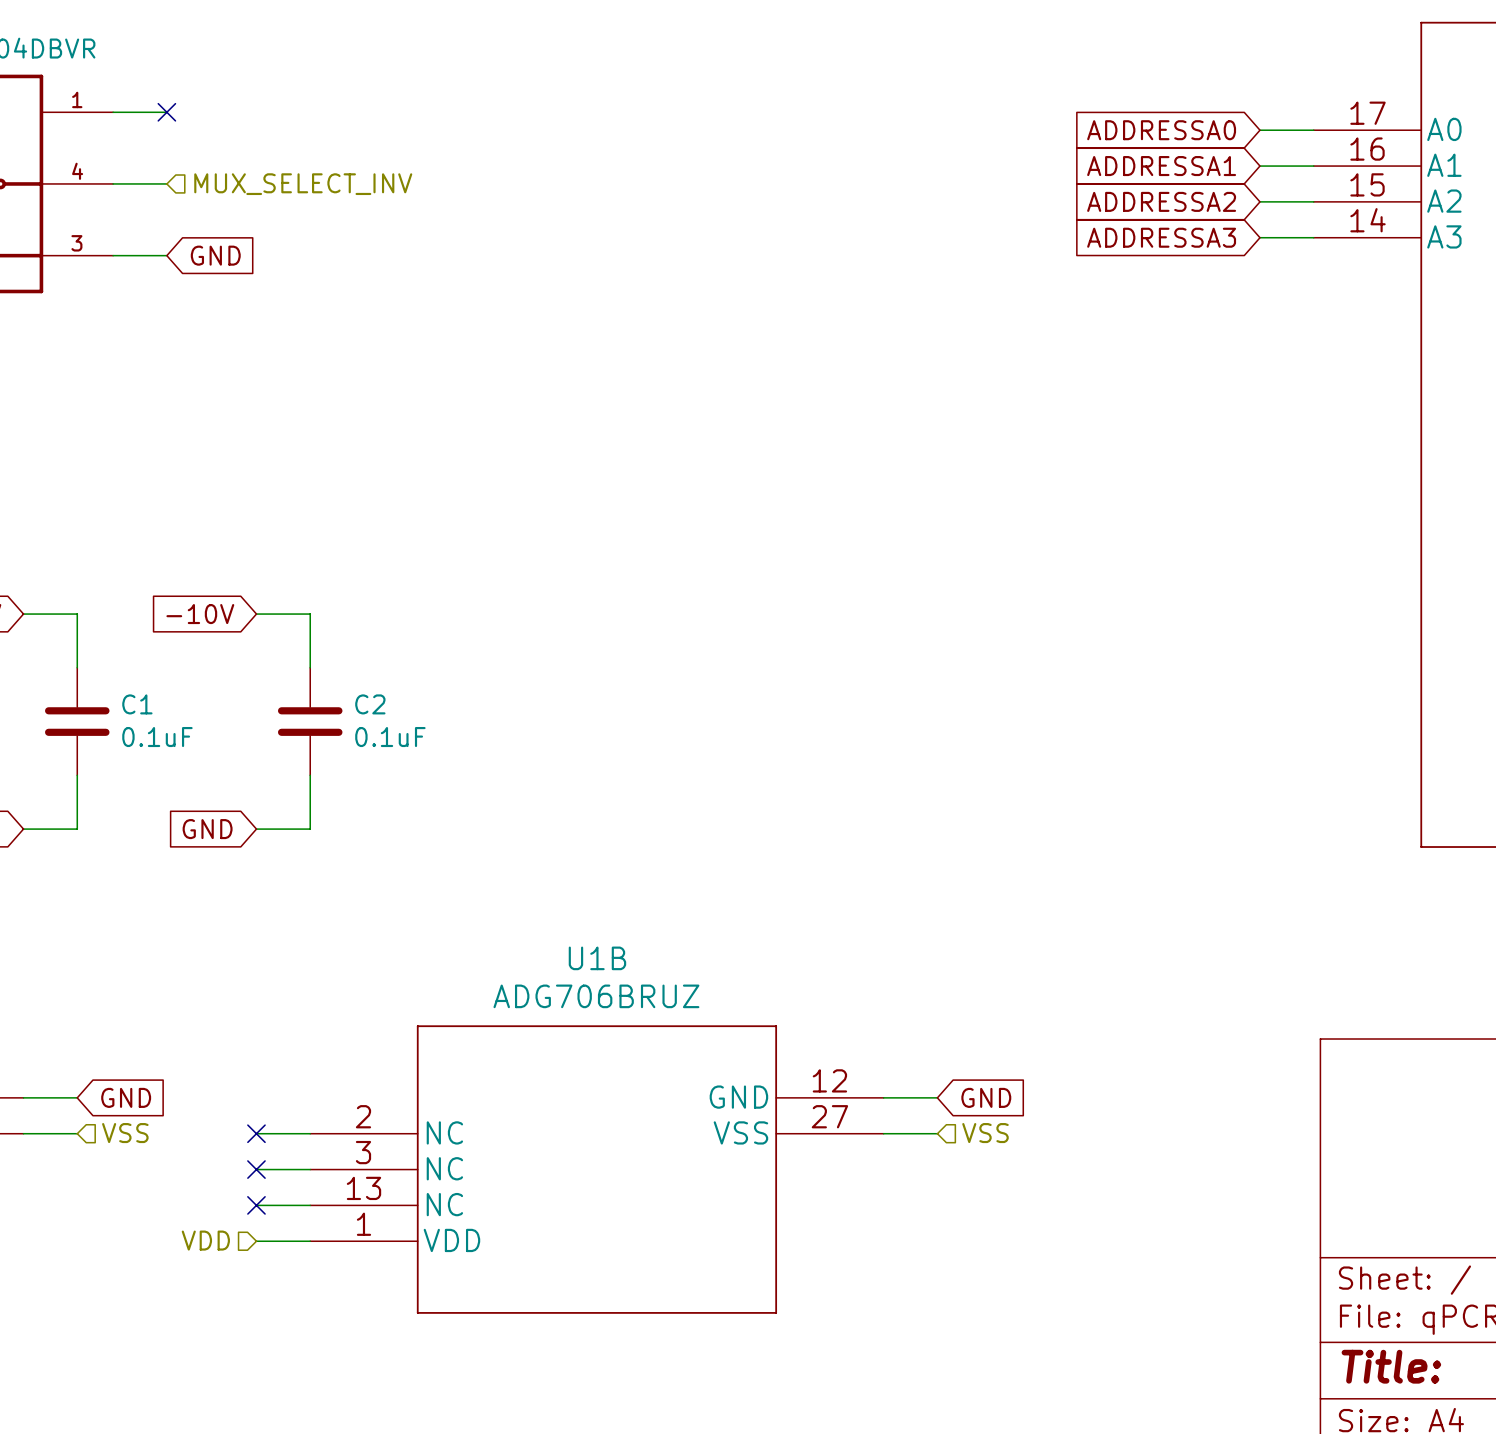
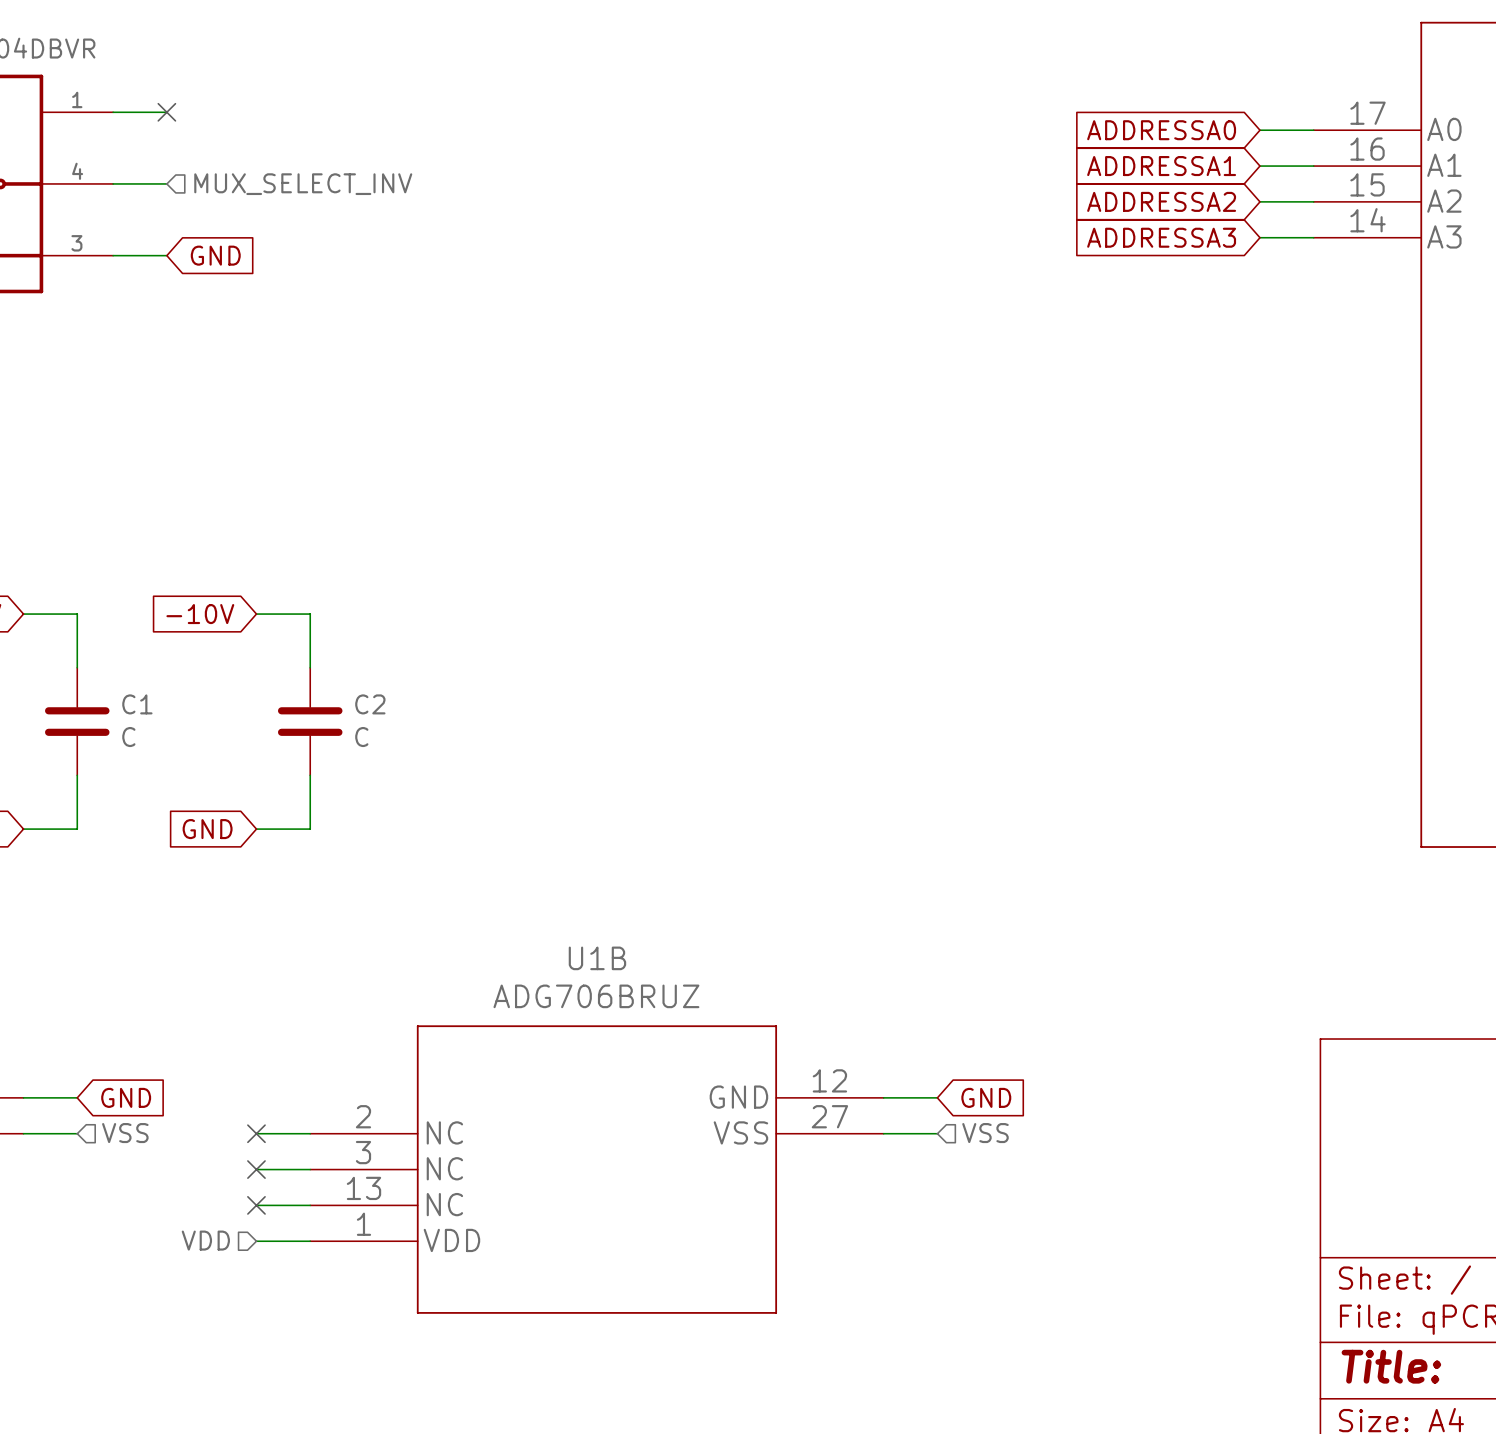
C1 value: 0.1uF (157, 737) -> C (128, 737)
C2 value: 0.1uF (390, 737) -> C (361, 737)

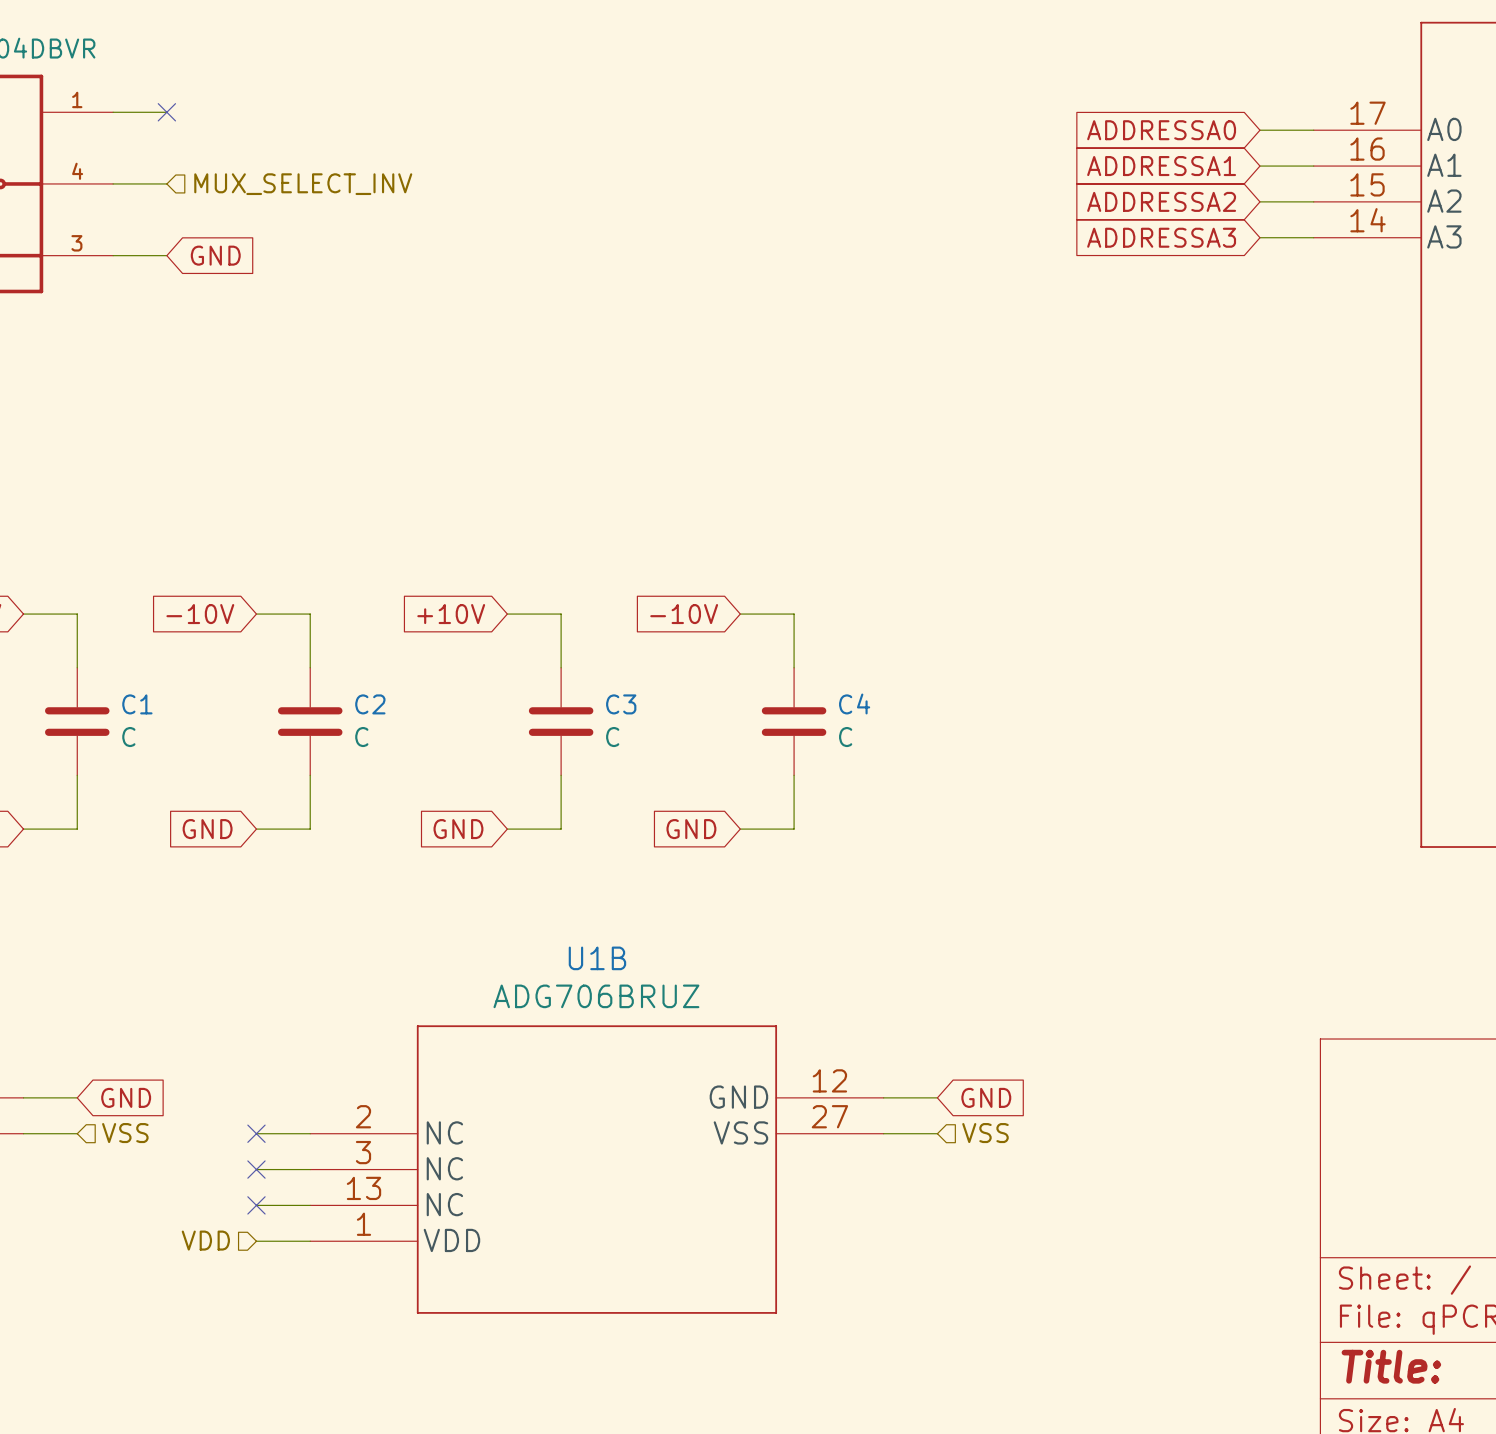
global label: none -> +10V (451, 614)
wire: none -> (507, 614) (561, 614) (561, 667)
global label: none -> -10V (684, 614)
wire: none -> (740, 614) (794, 614) (794, 667)
C3: none -> C (561, 721)
C4: none -> C (794, 721)
wire: none -> (561, 775) (561, 829) (507, 829)
wire: none -> (794, 775) (794, 829) (740, 829)
global label: none -> GND (458, 829)
global label: none -> GND (691, 829)

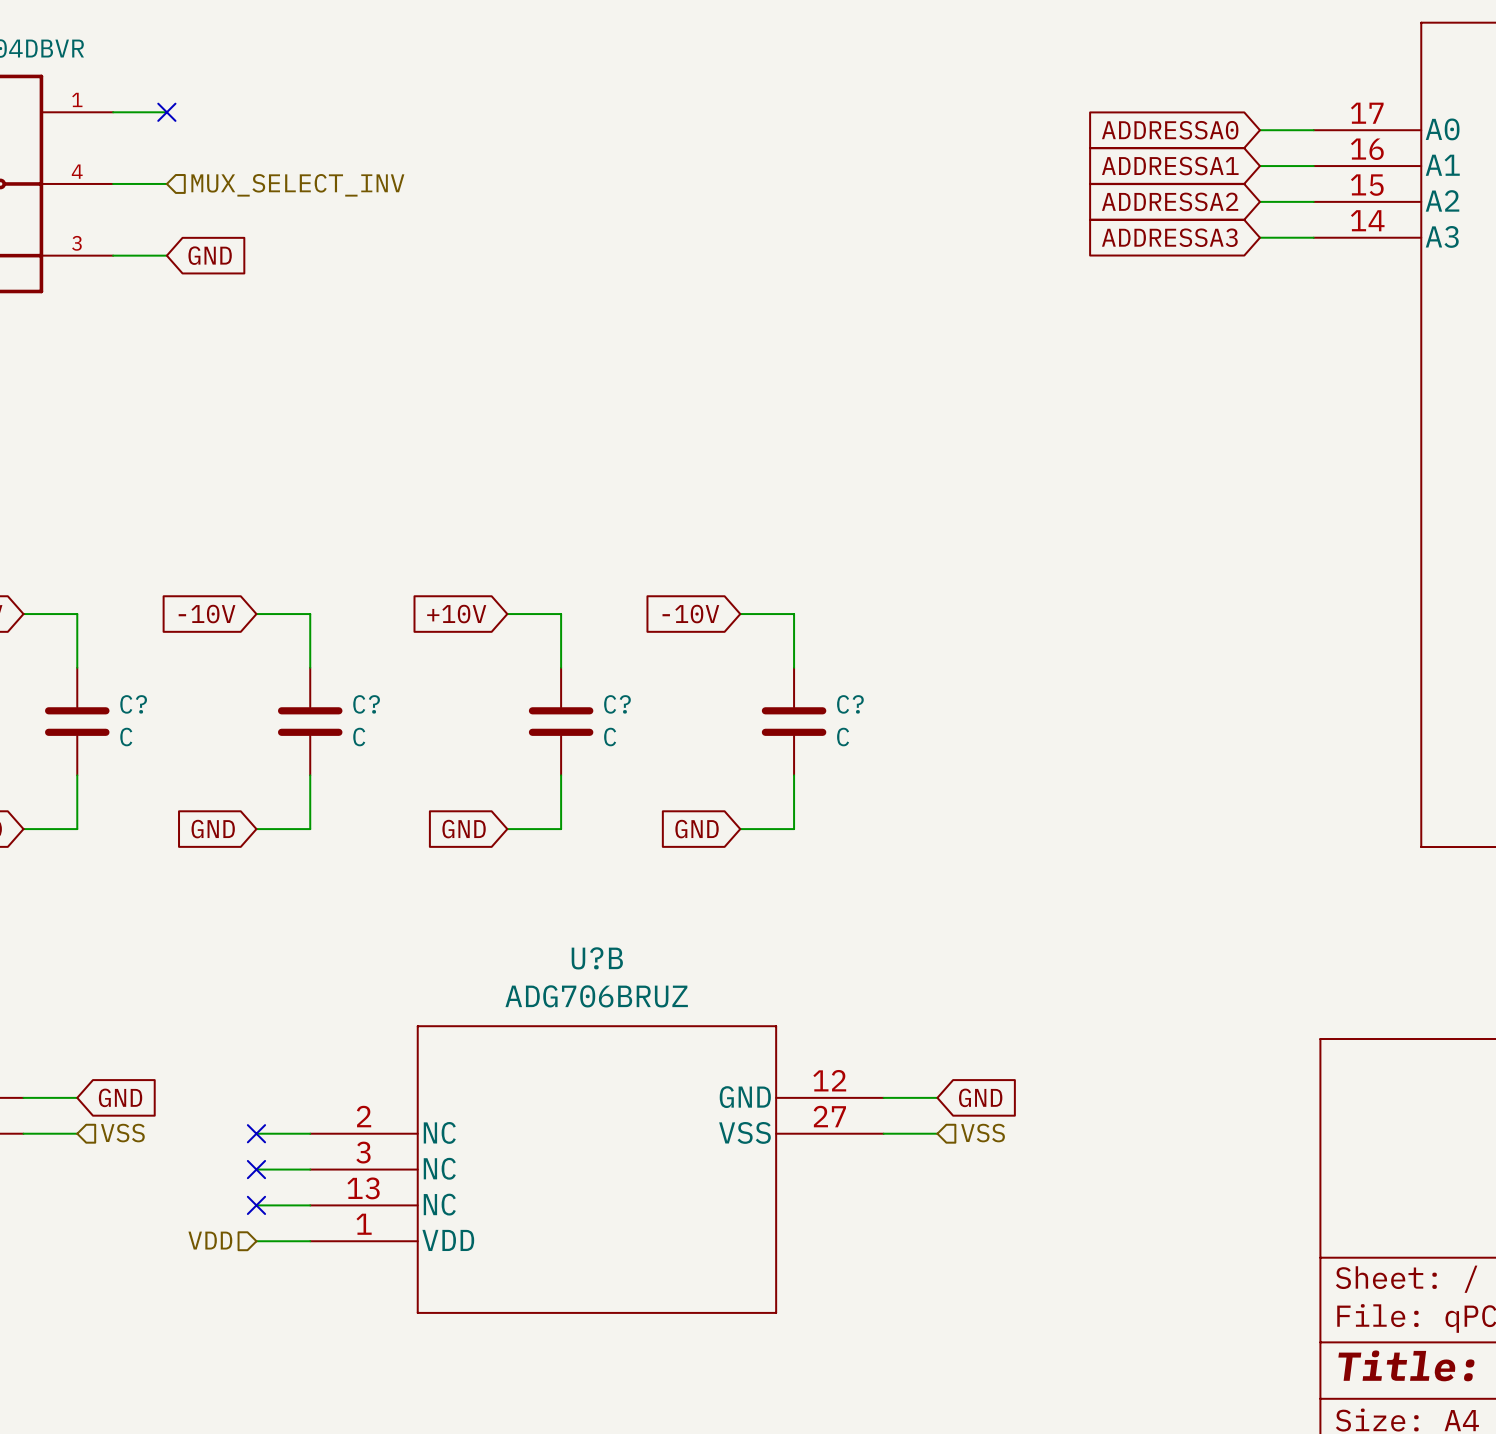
C4 name: C4 (854, 703) -> C? (850, 704)
C1 name: C1 (137, 704) -> C? (133, 704)
C2 name: C2 (370, 704) -> C? (366, 704)
C3 name: C3 (621, 704) -> C? (617, 704)
U1B name: U1B (597, 958) -> U?B (597, 958)

